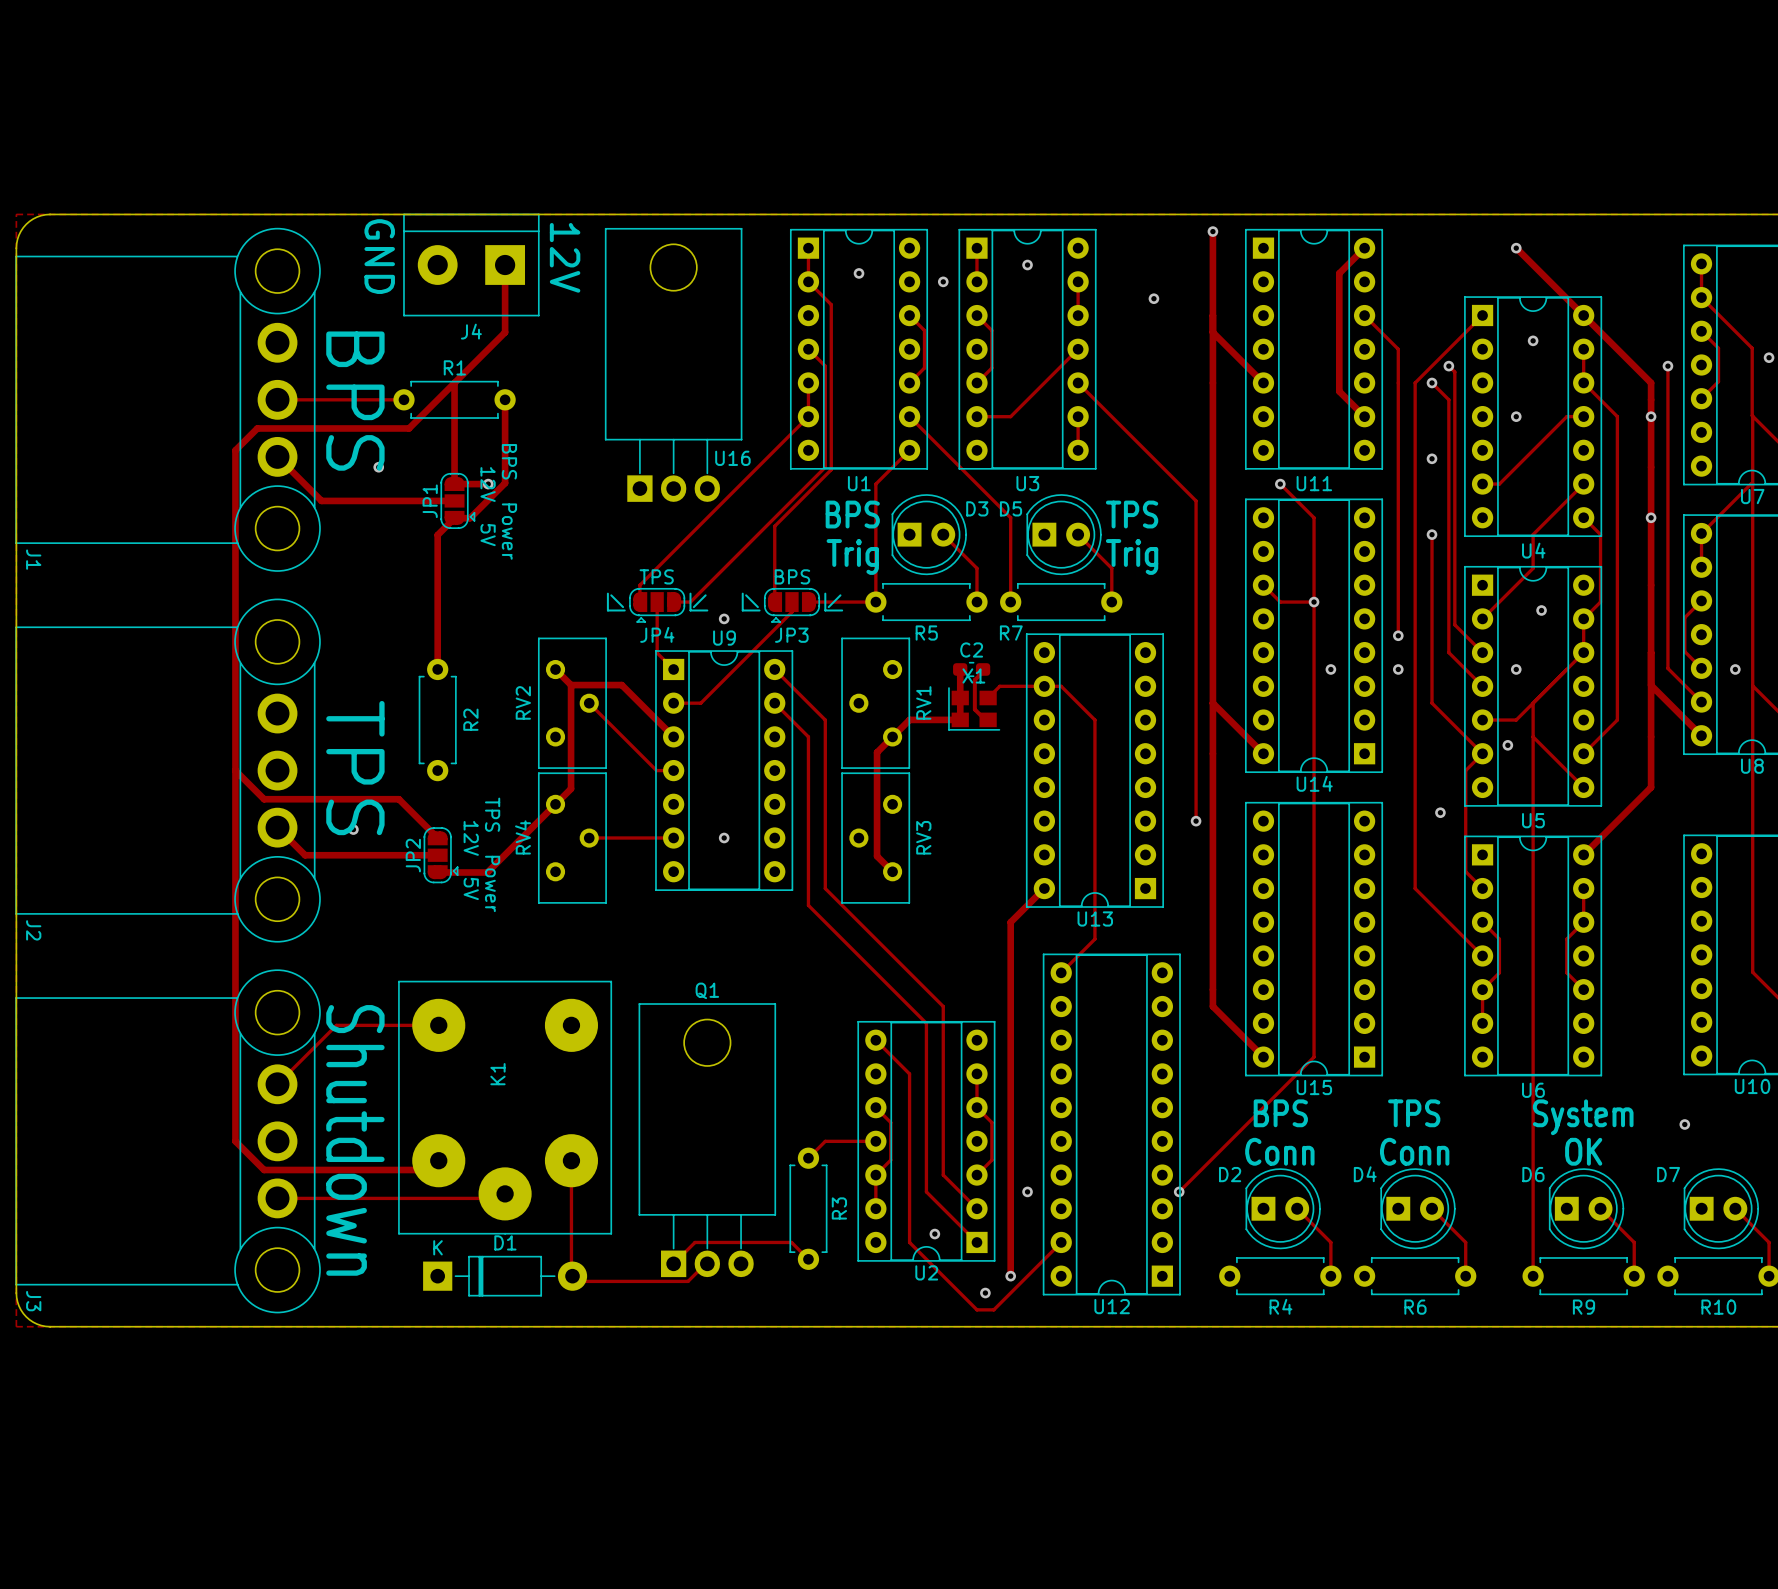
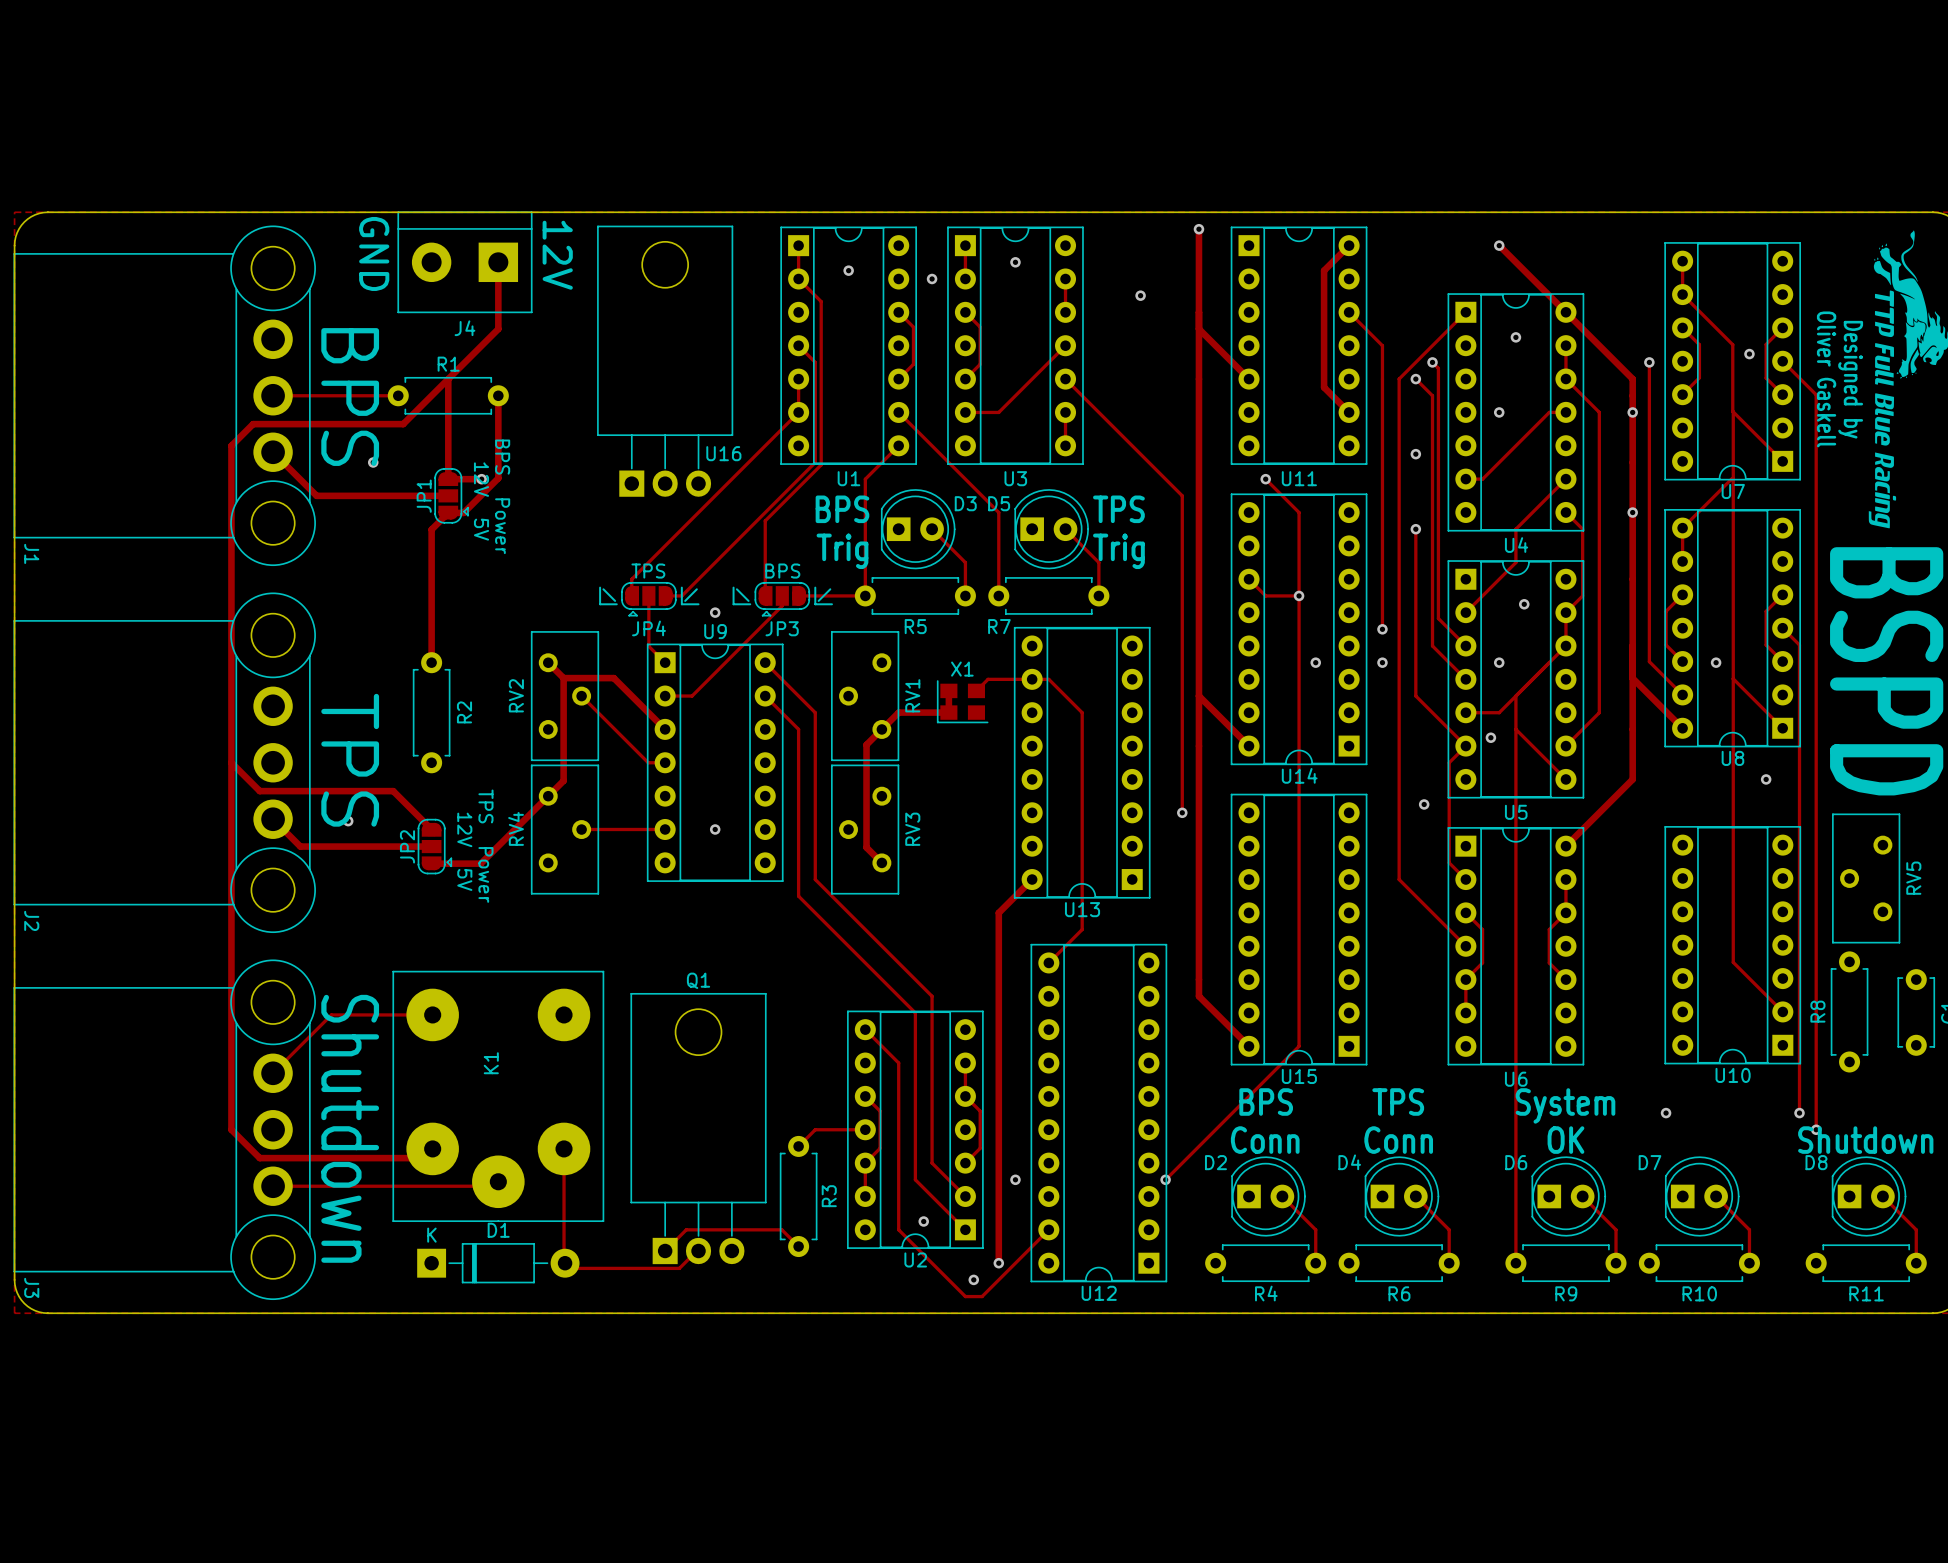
track: (960, 669) (960, 698) -> none
C2: (971, 669) -> none
track: (983, 669) (974, 680) (974, 709) (985, 719) (988, 719) -> none

